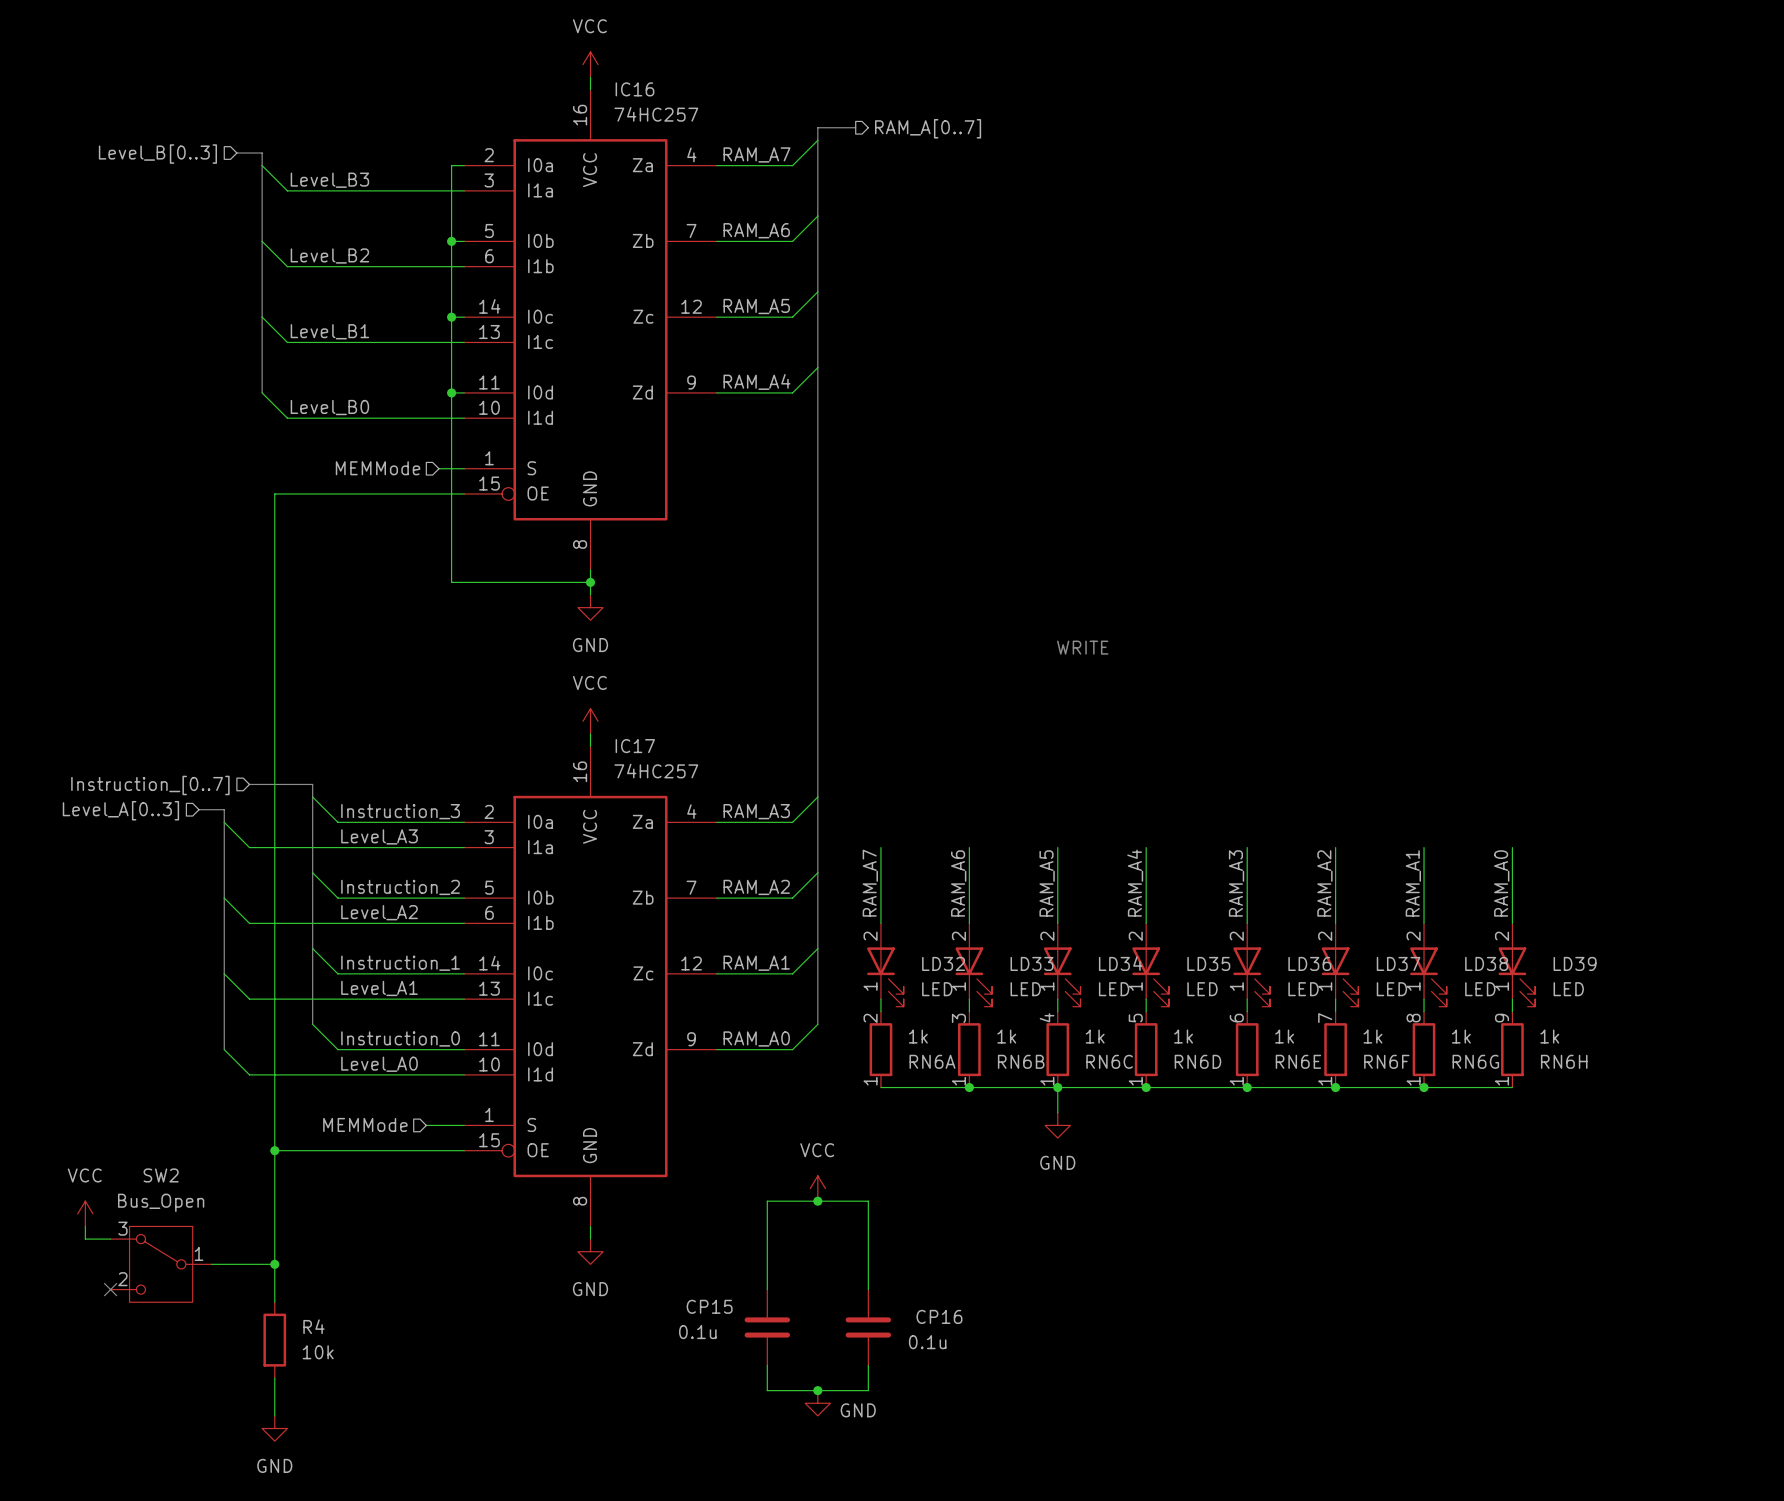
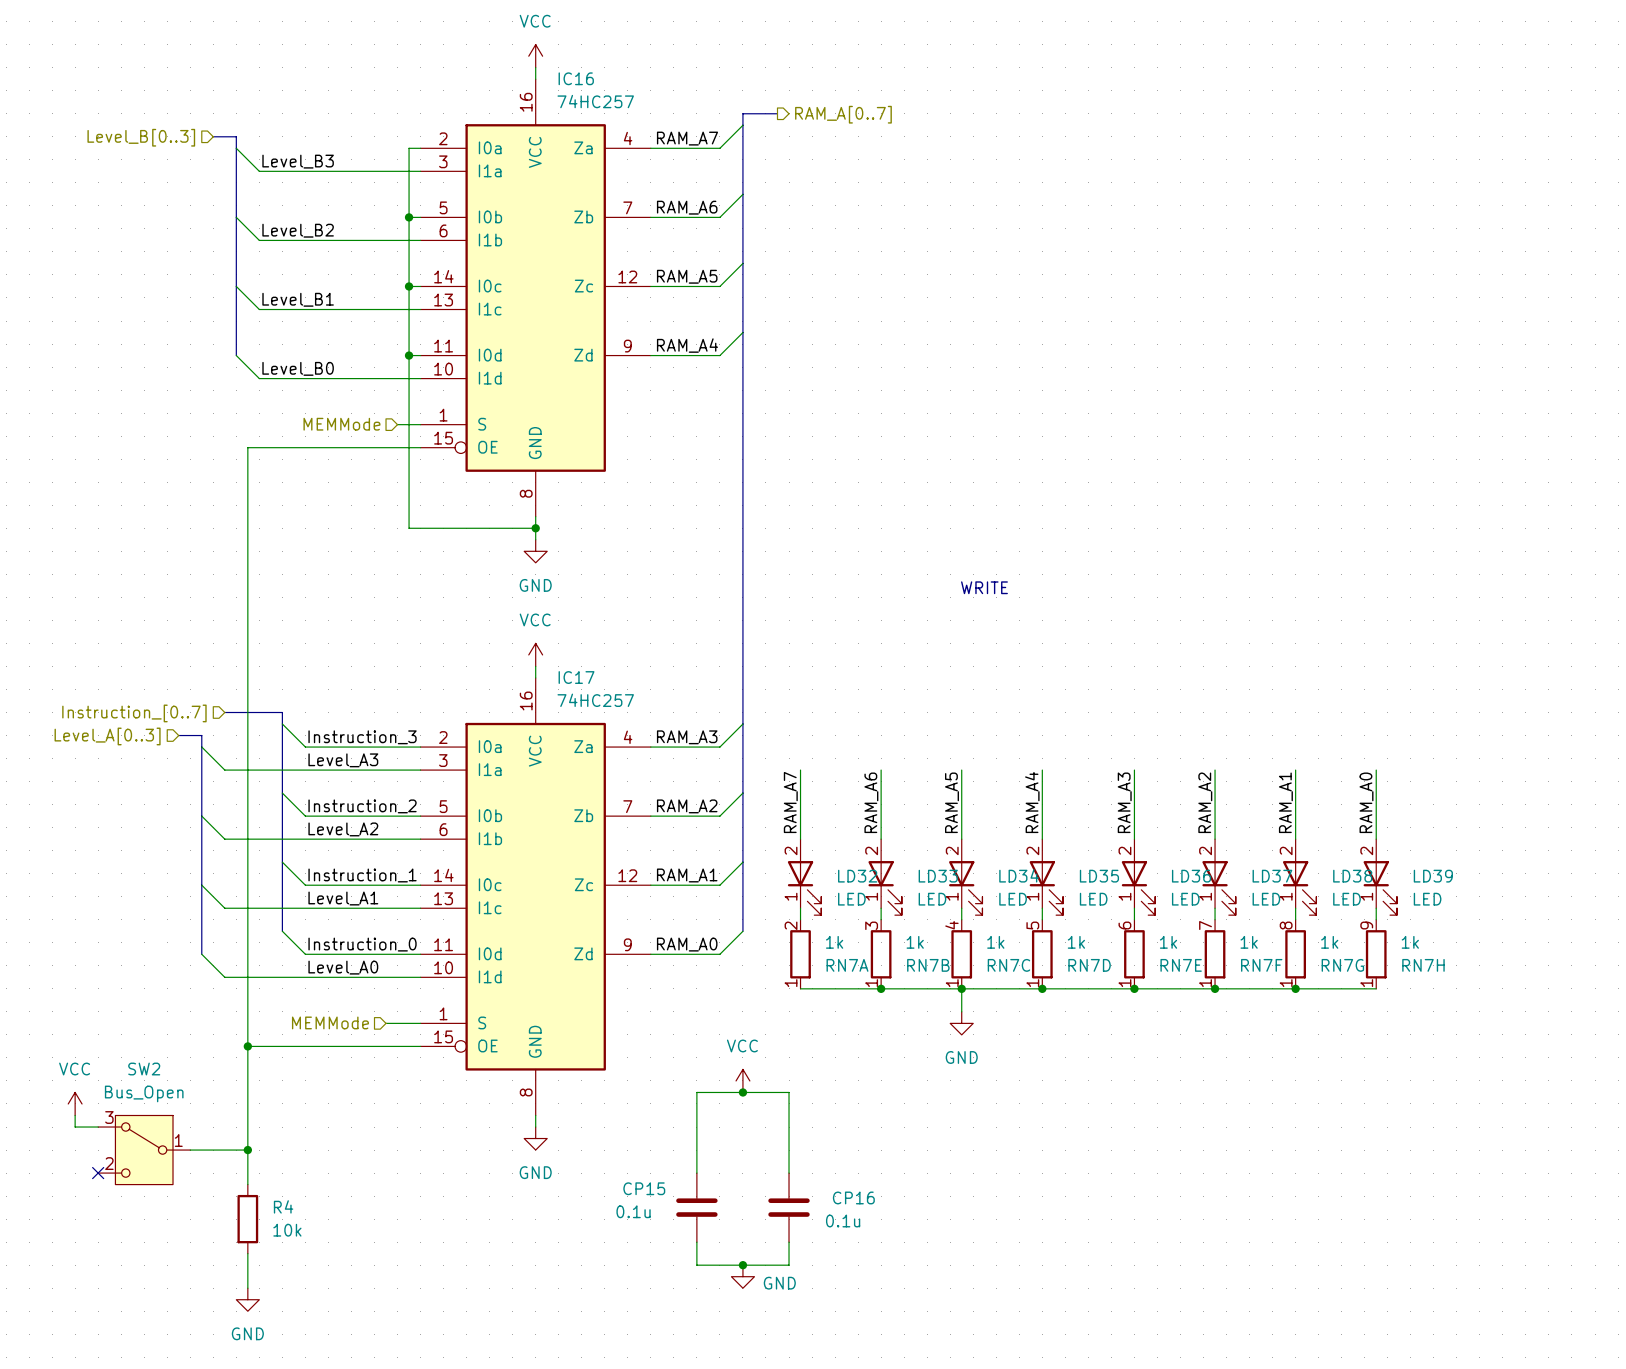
RN6A name: RN6A (932, 1061) -> RN7A (847, 965)
RN6B name: RN6B (1021, 1061) -> RN7B (928, 965)
RN6C name: RN6C (1109, 1061) -> RN7C (1008, 965)
RN6D name: RN6D (1197, 1061) -> RN7D (1089, 965)
RN6E name: RN6E (1298, 1061) -> RN7E (1181, 965)
RN6F name: RN6F (1386, 1061) -> RN7F (1261, 965)
RN6G name: RN6G (1475, 1061) -> RN7G (1342, 965)
RN6H name: RN6H (1564, 1061) -> RN7H (1423, 965)

